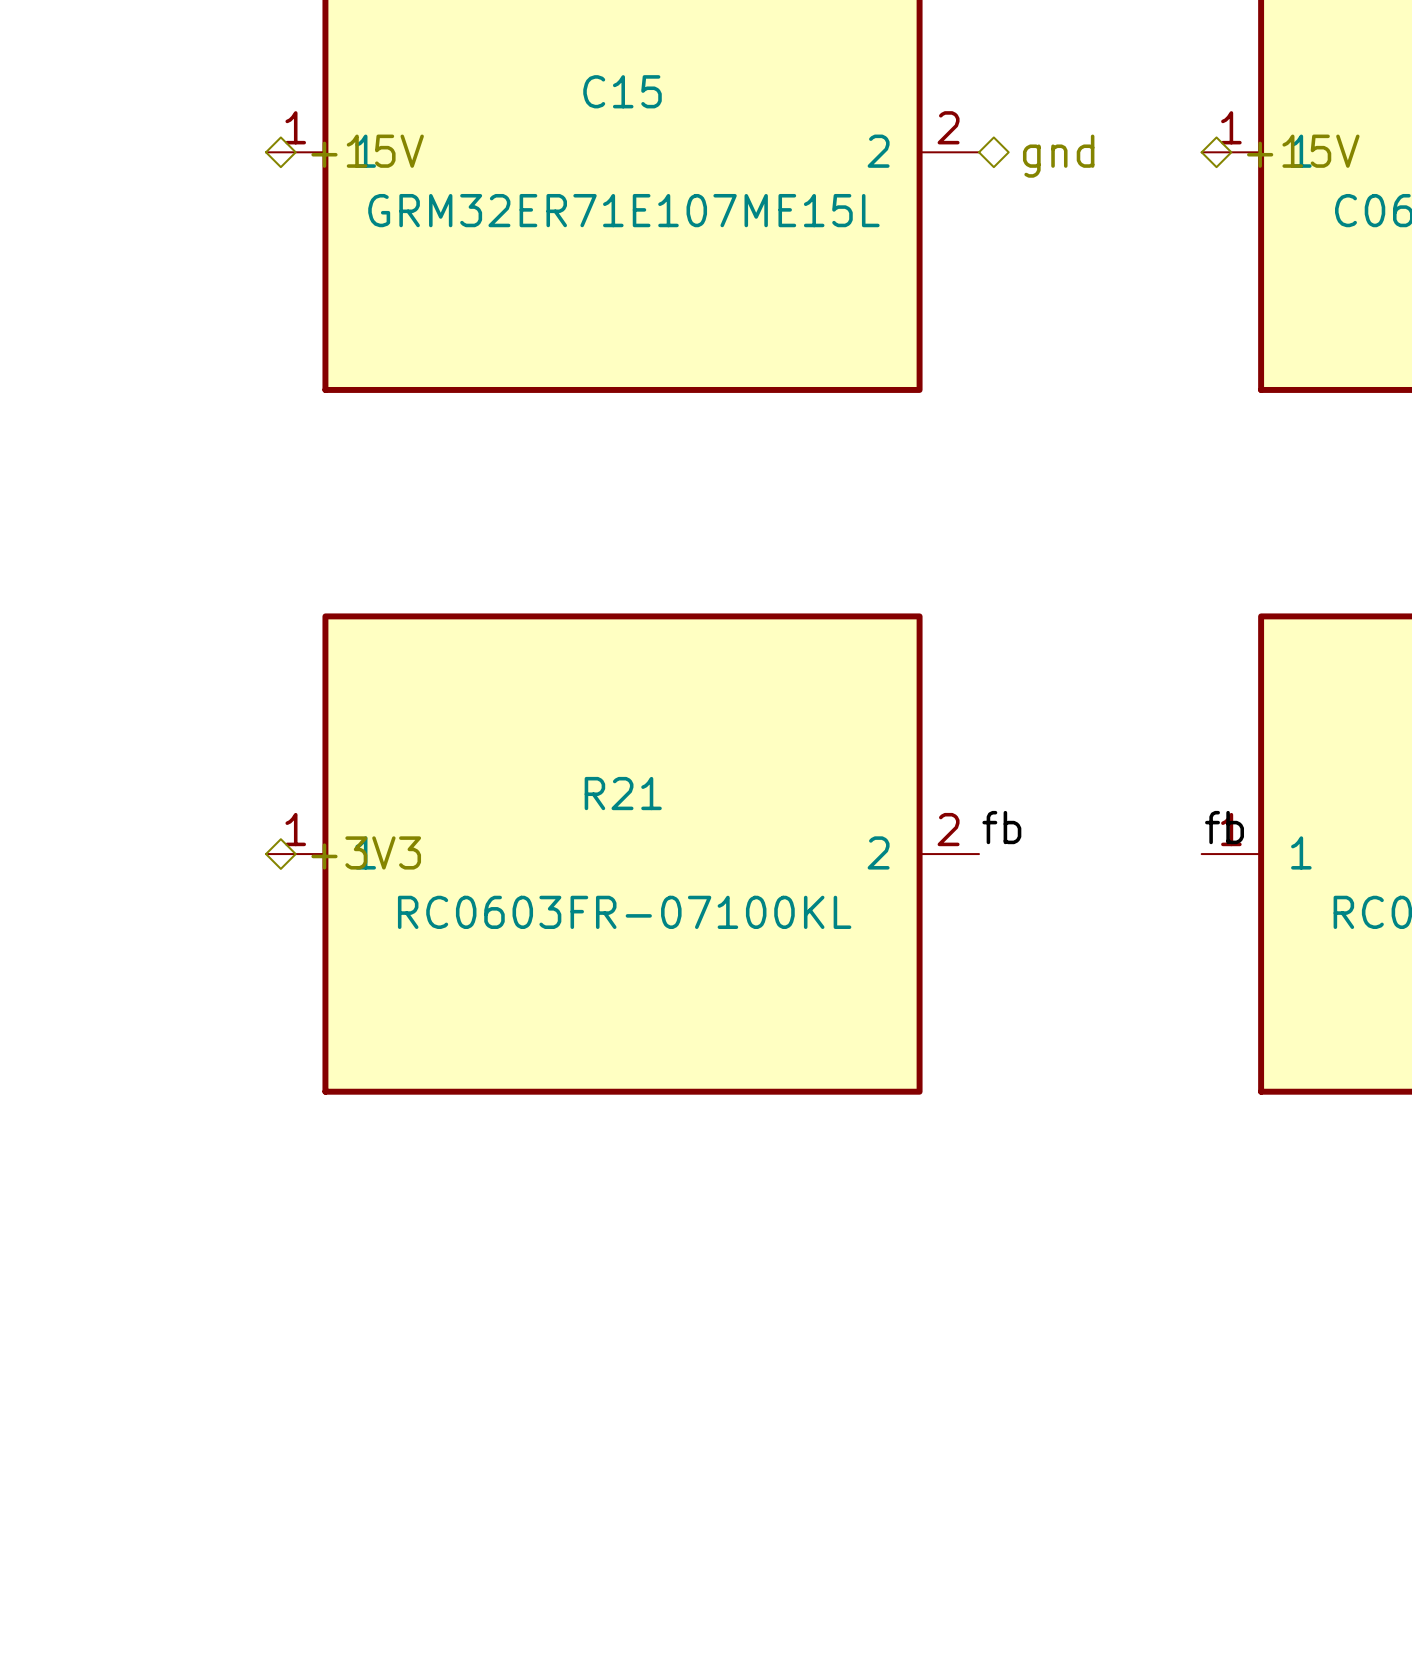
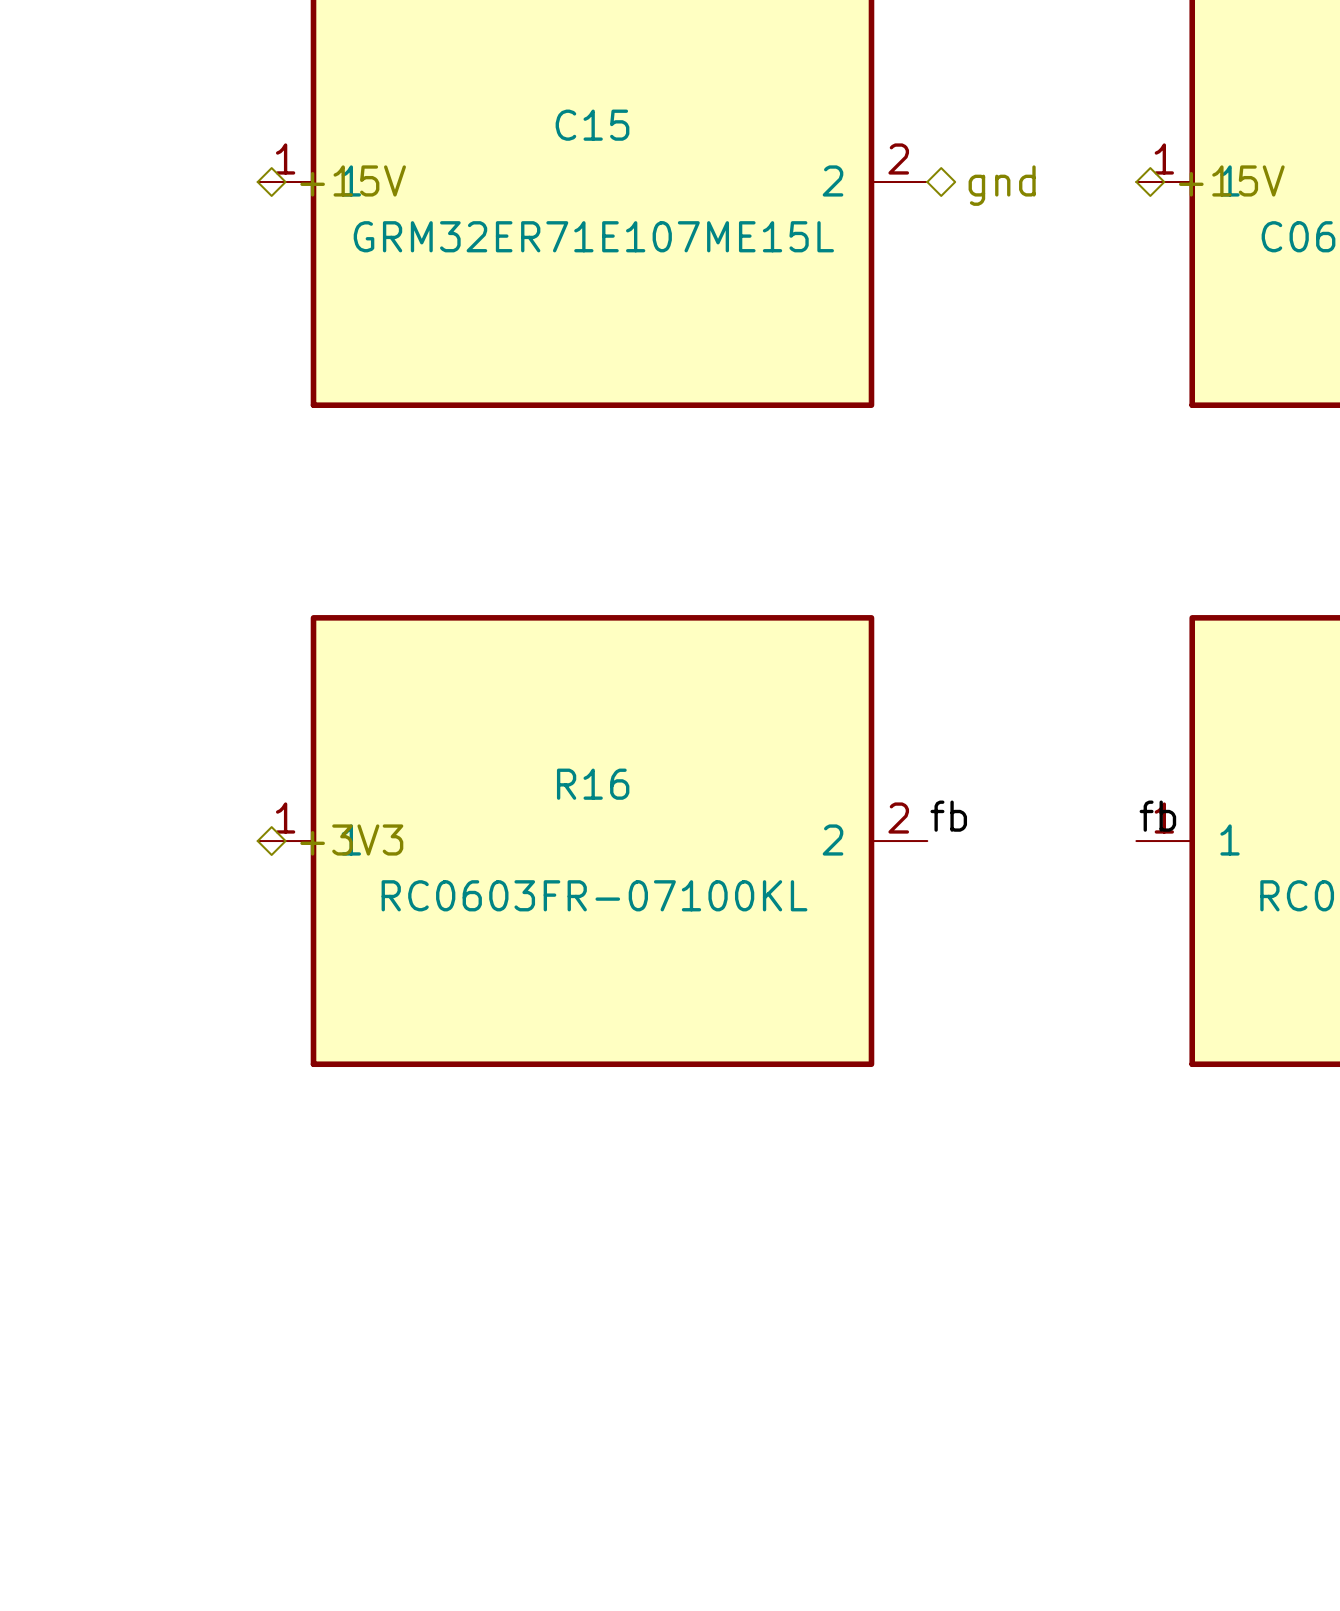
R21 name: R21 (623, 793) -> R16 (593, 784)

